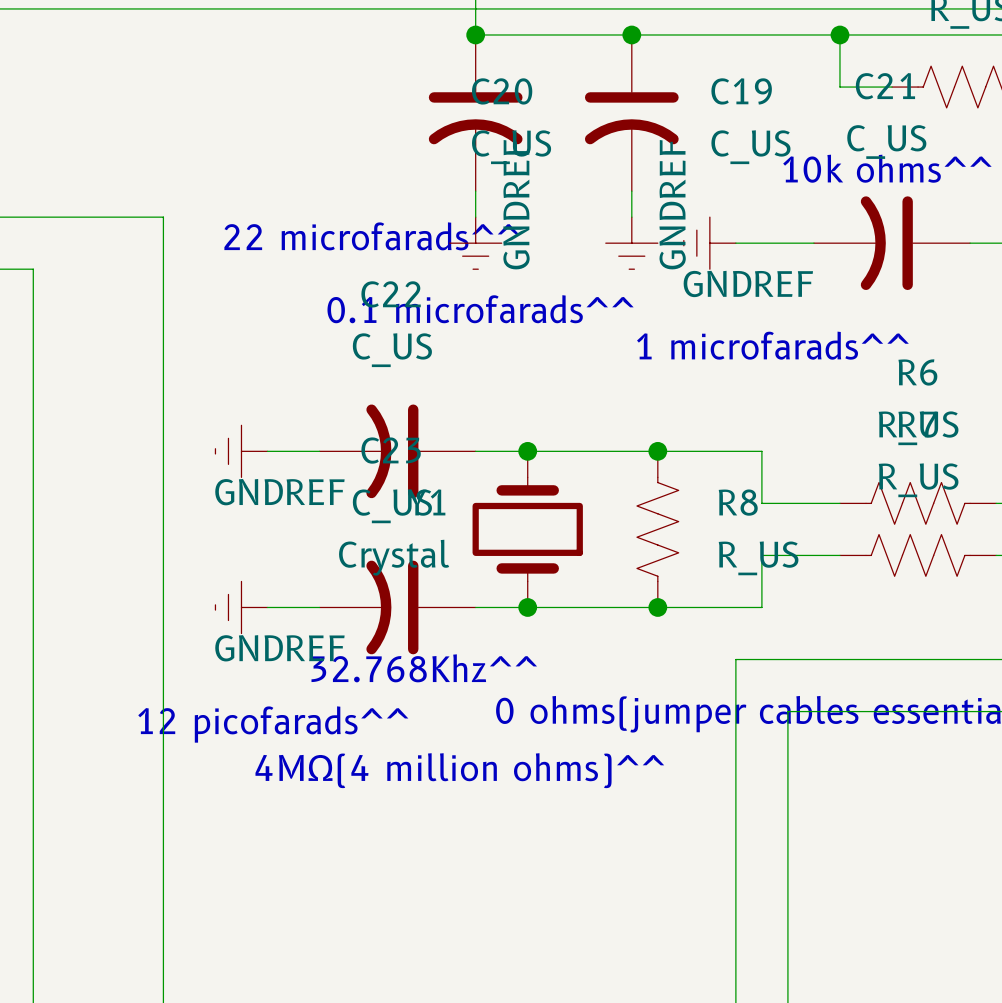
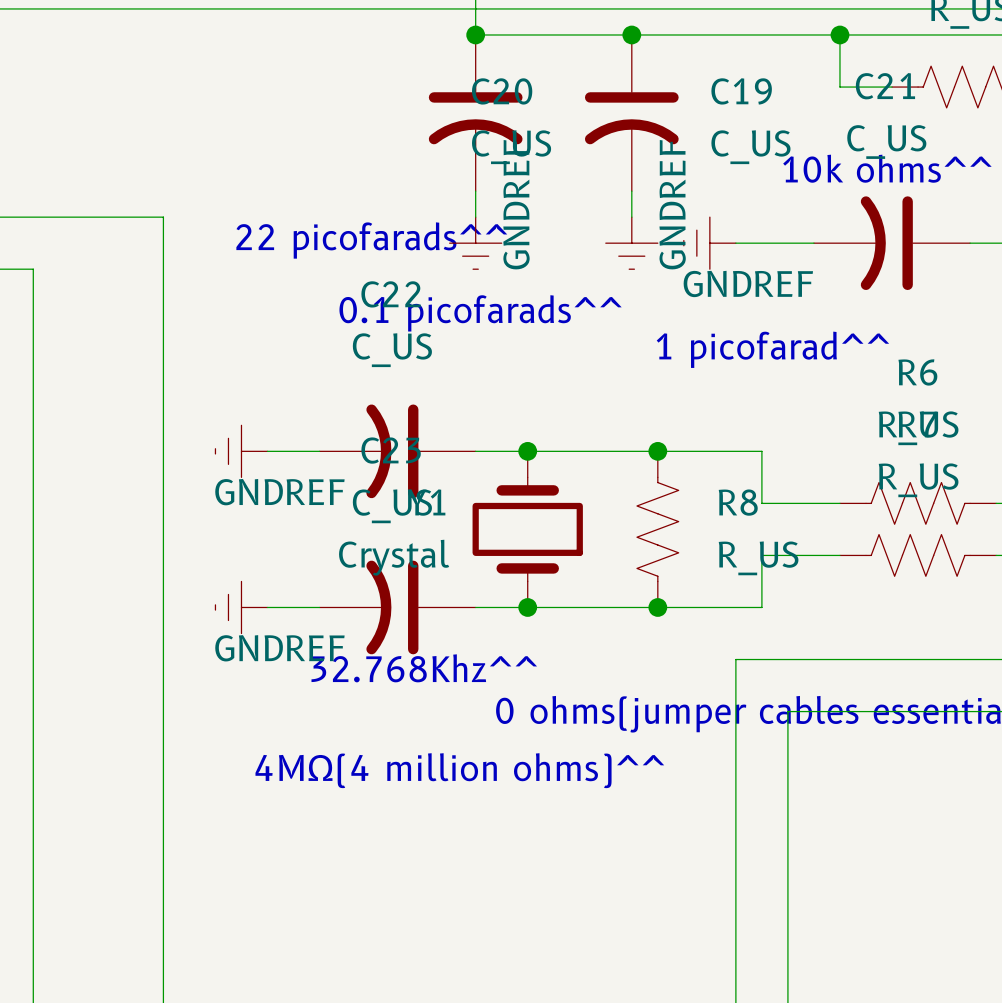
text: 22 microfarads^^ (371, 236) -> 22 picofarads^^ (371, 240)
text: 0.1 microfarads^^ (480, 309) -> 0.1 picofarads^^ (480, 313)
text: 1 microfarads^^ (772, 345) -> 1 picofarad^^ (772, 349)
text: 12 picofarads^^ (273, 724) -> none

